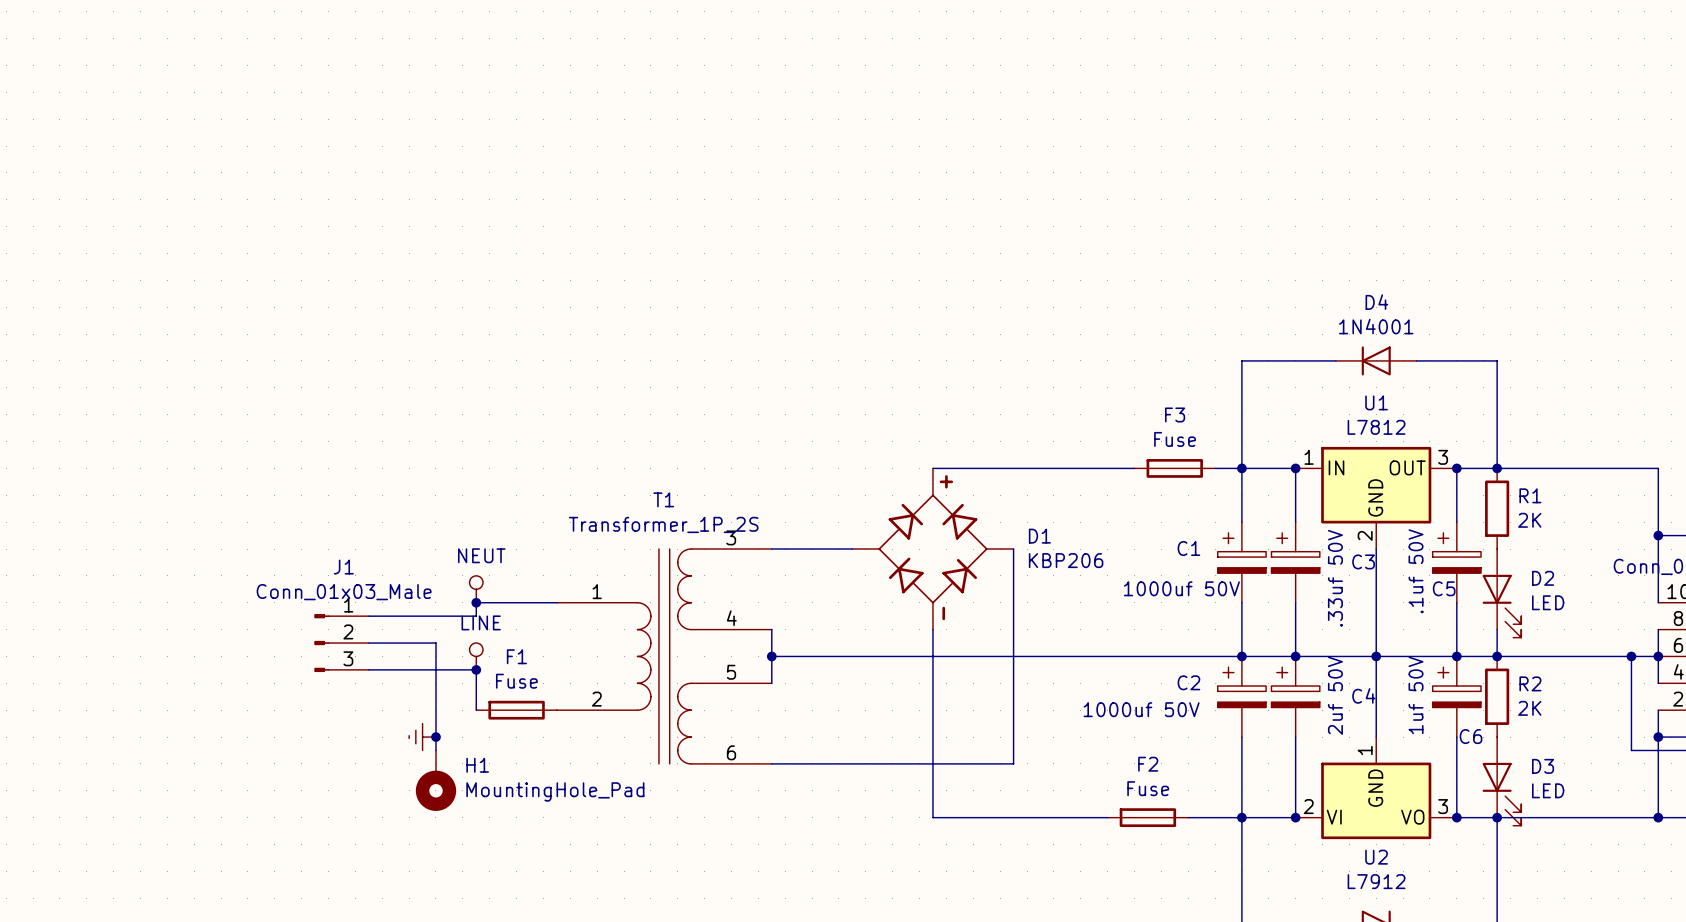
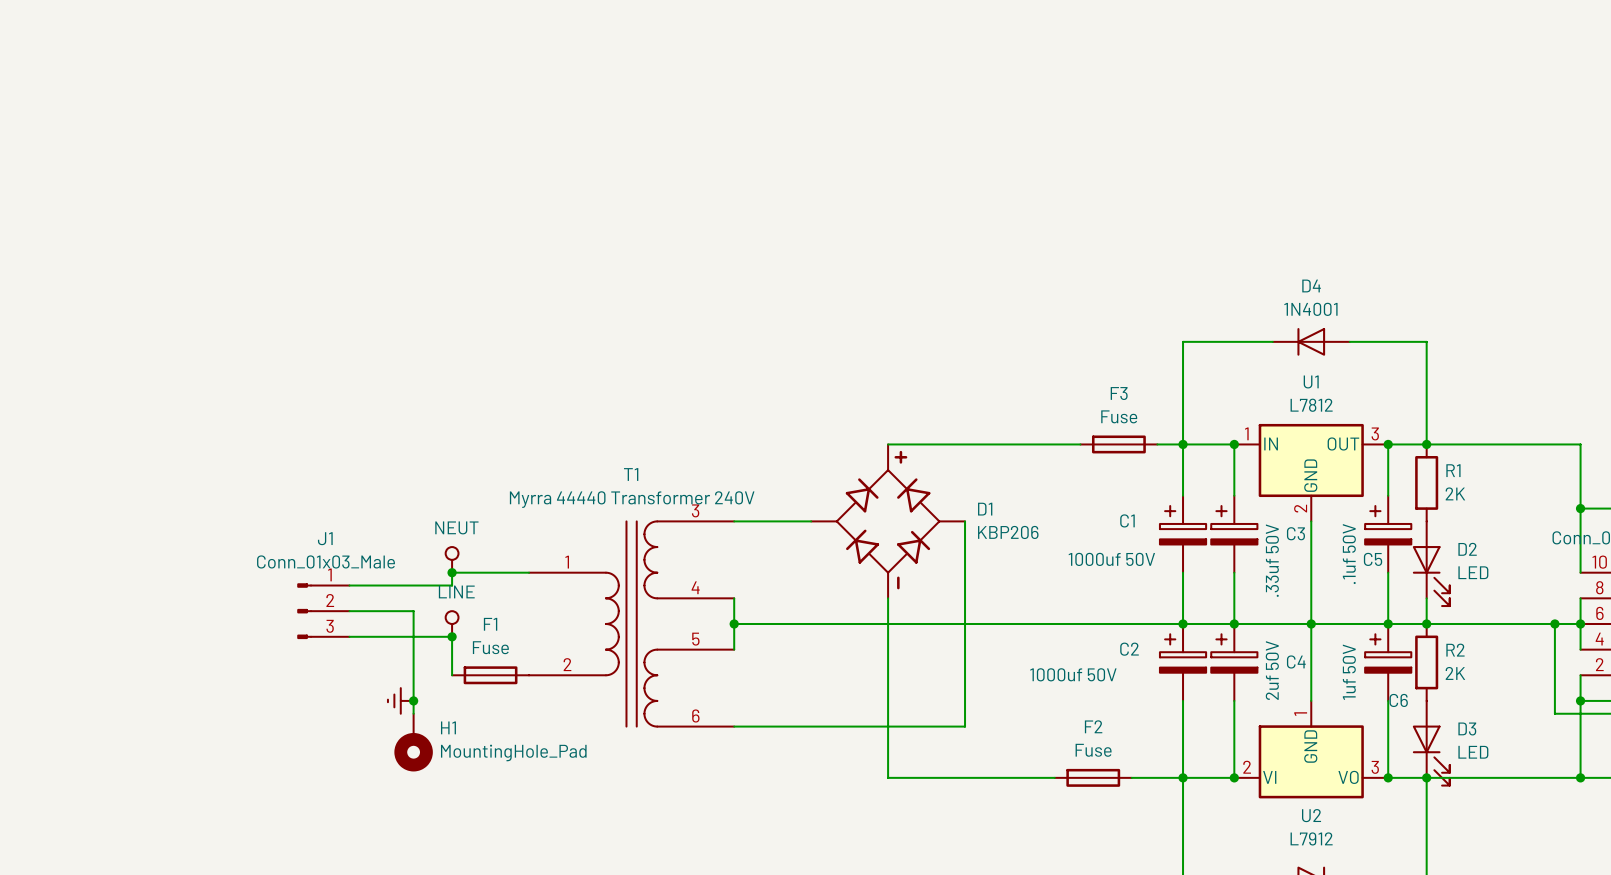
T1 value: Transformer_1P_2S (663, 524) -> Myrra 44440 Transformer 240V (632, 499)

